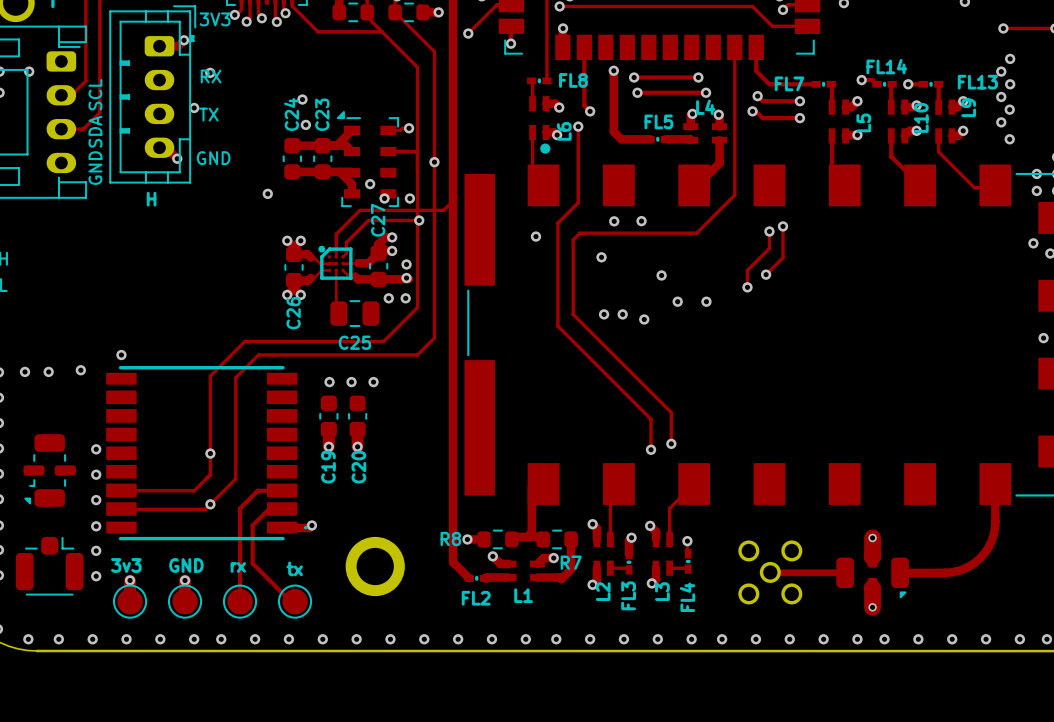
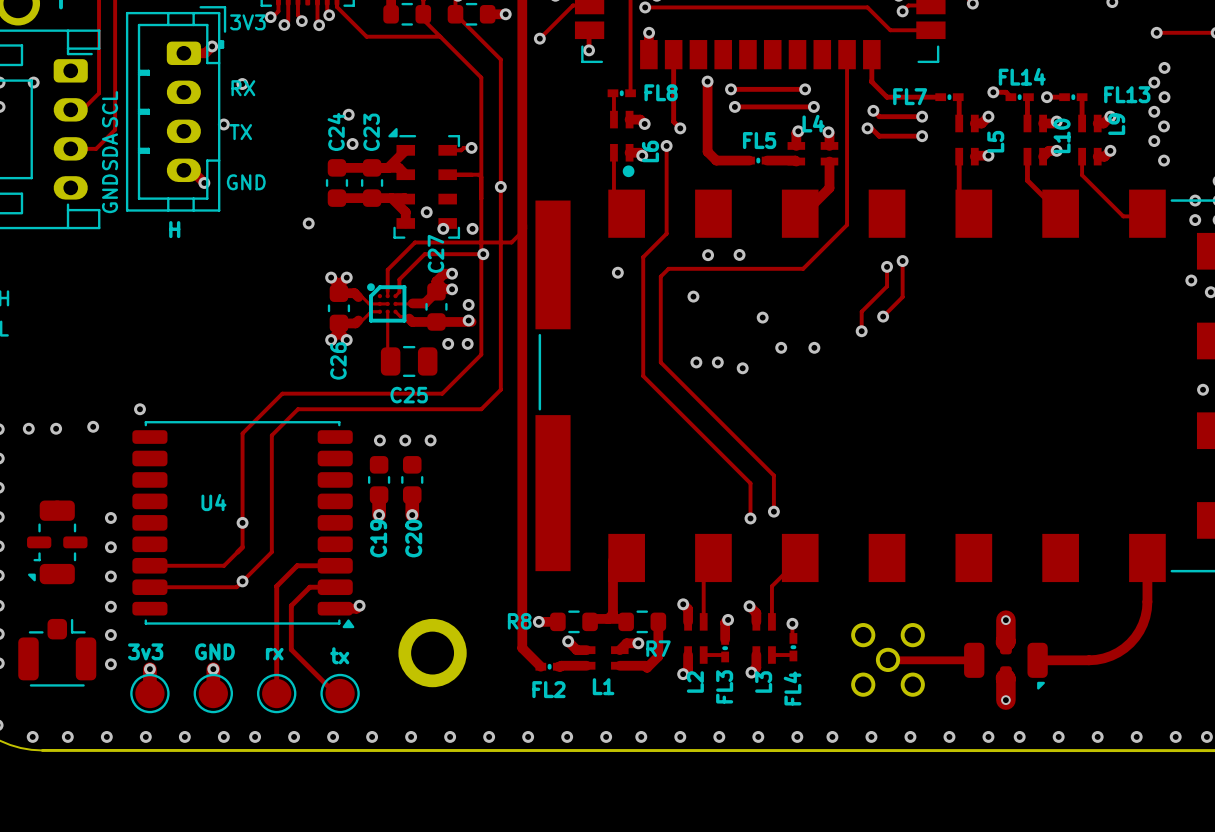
part: (206, 453) -> none
U4: none -> (243, 524)

